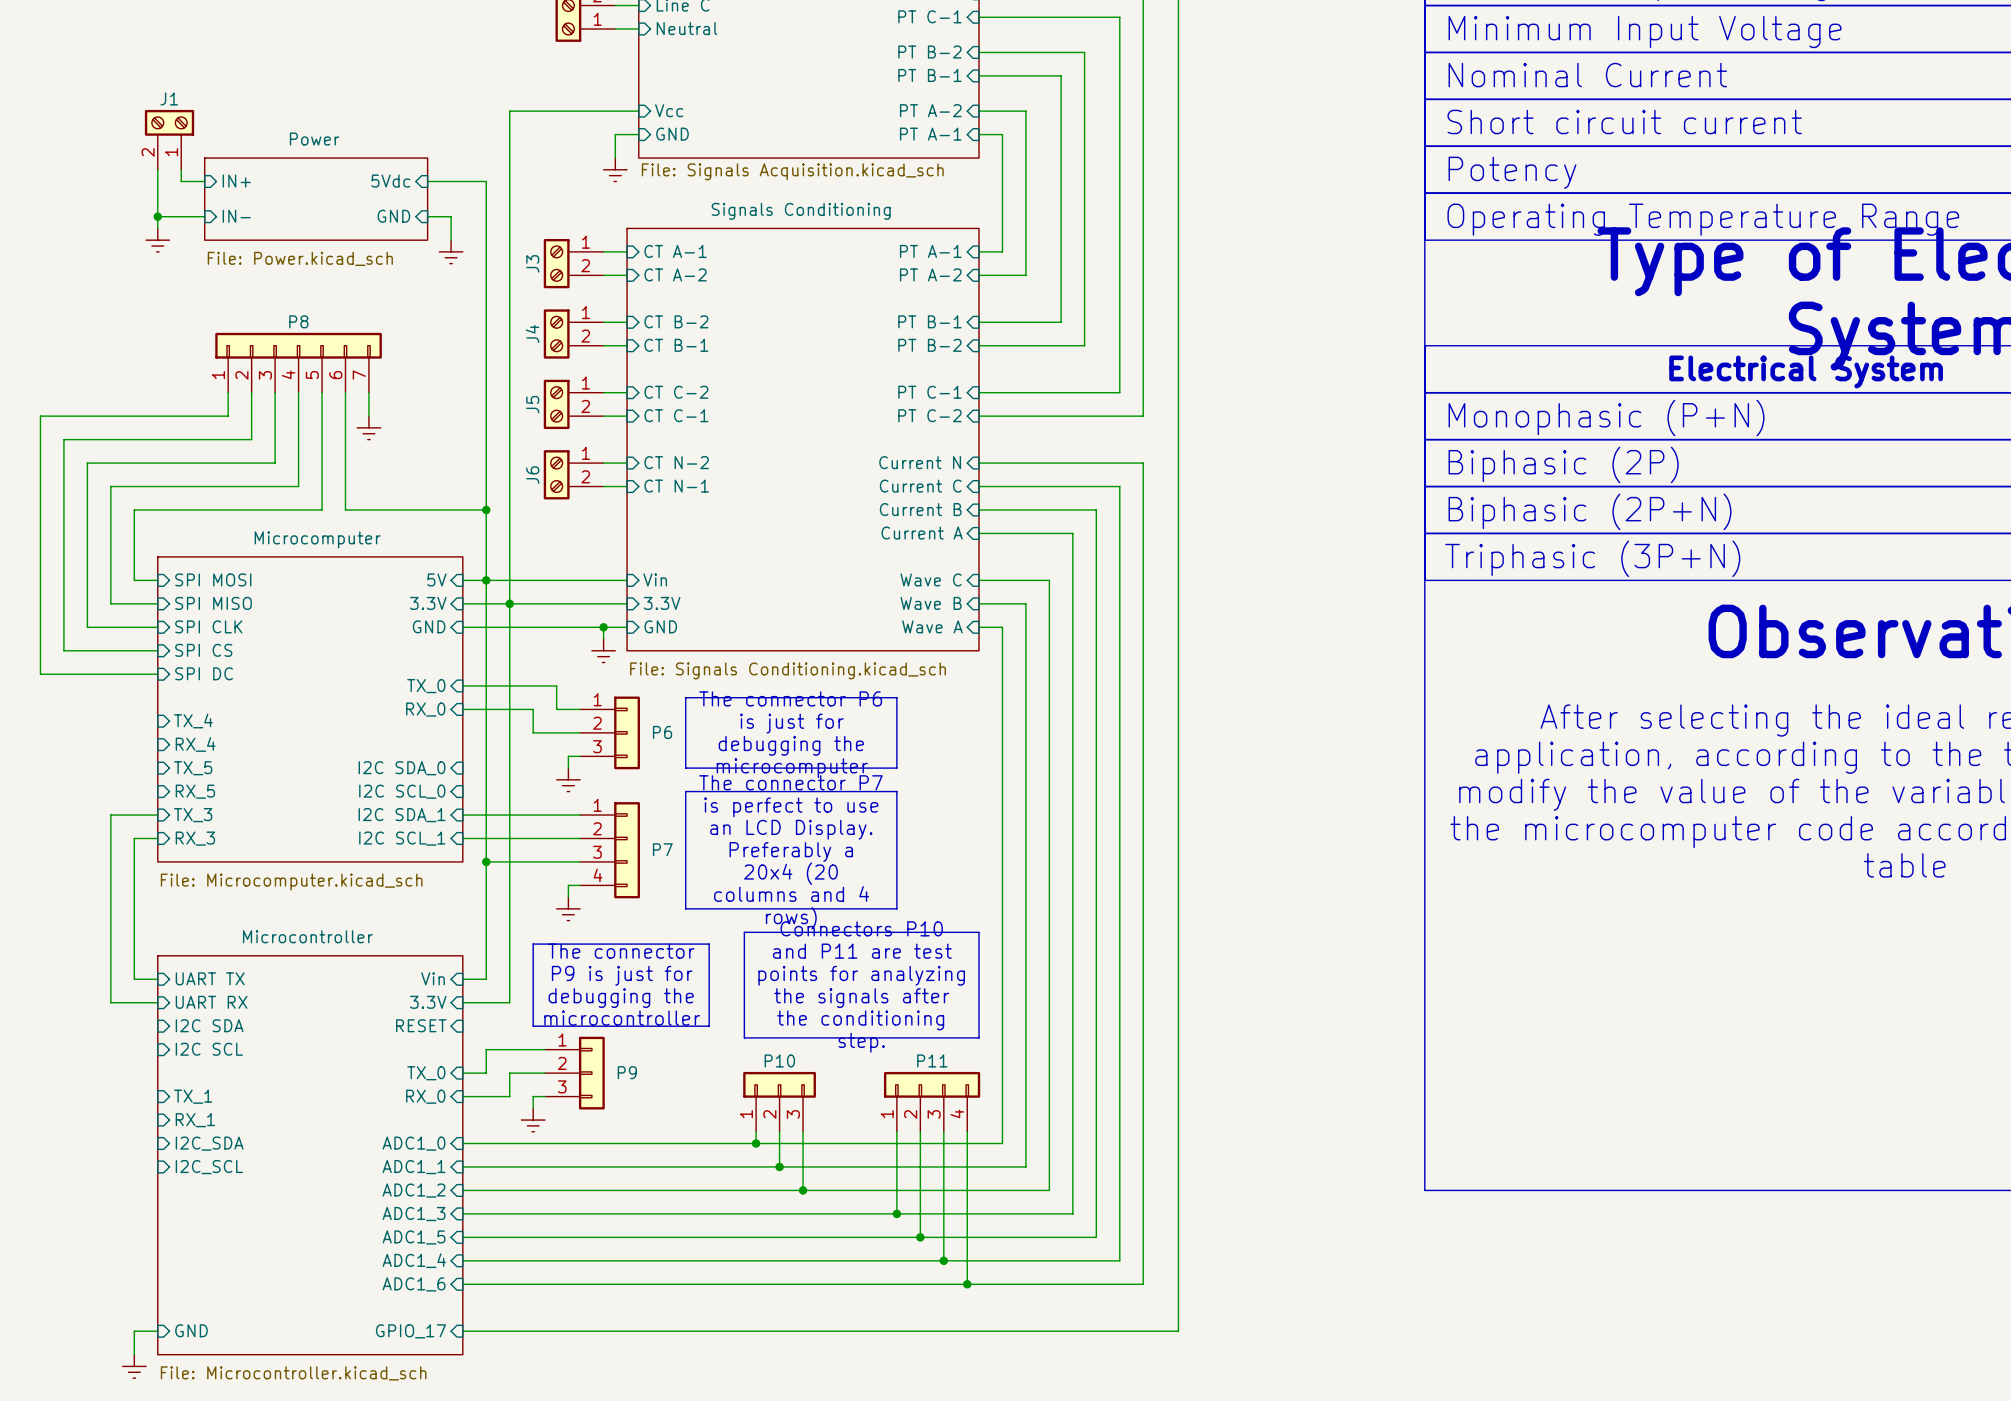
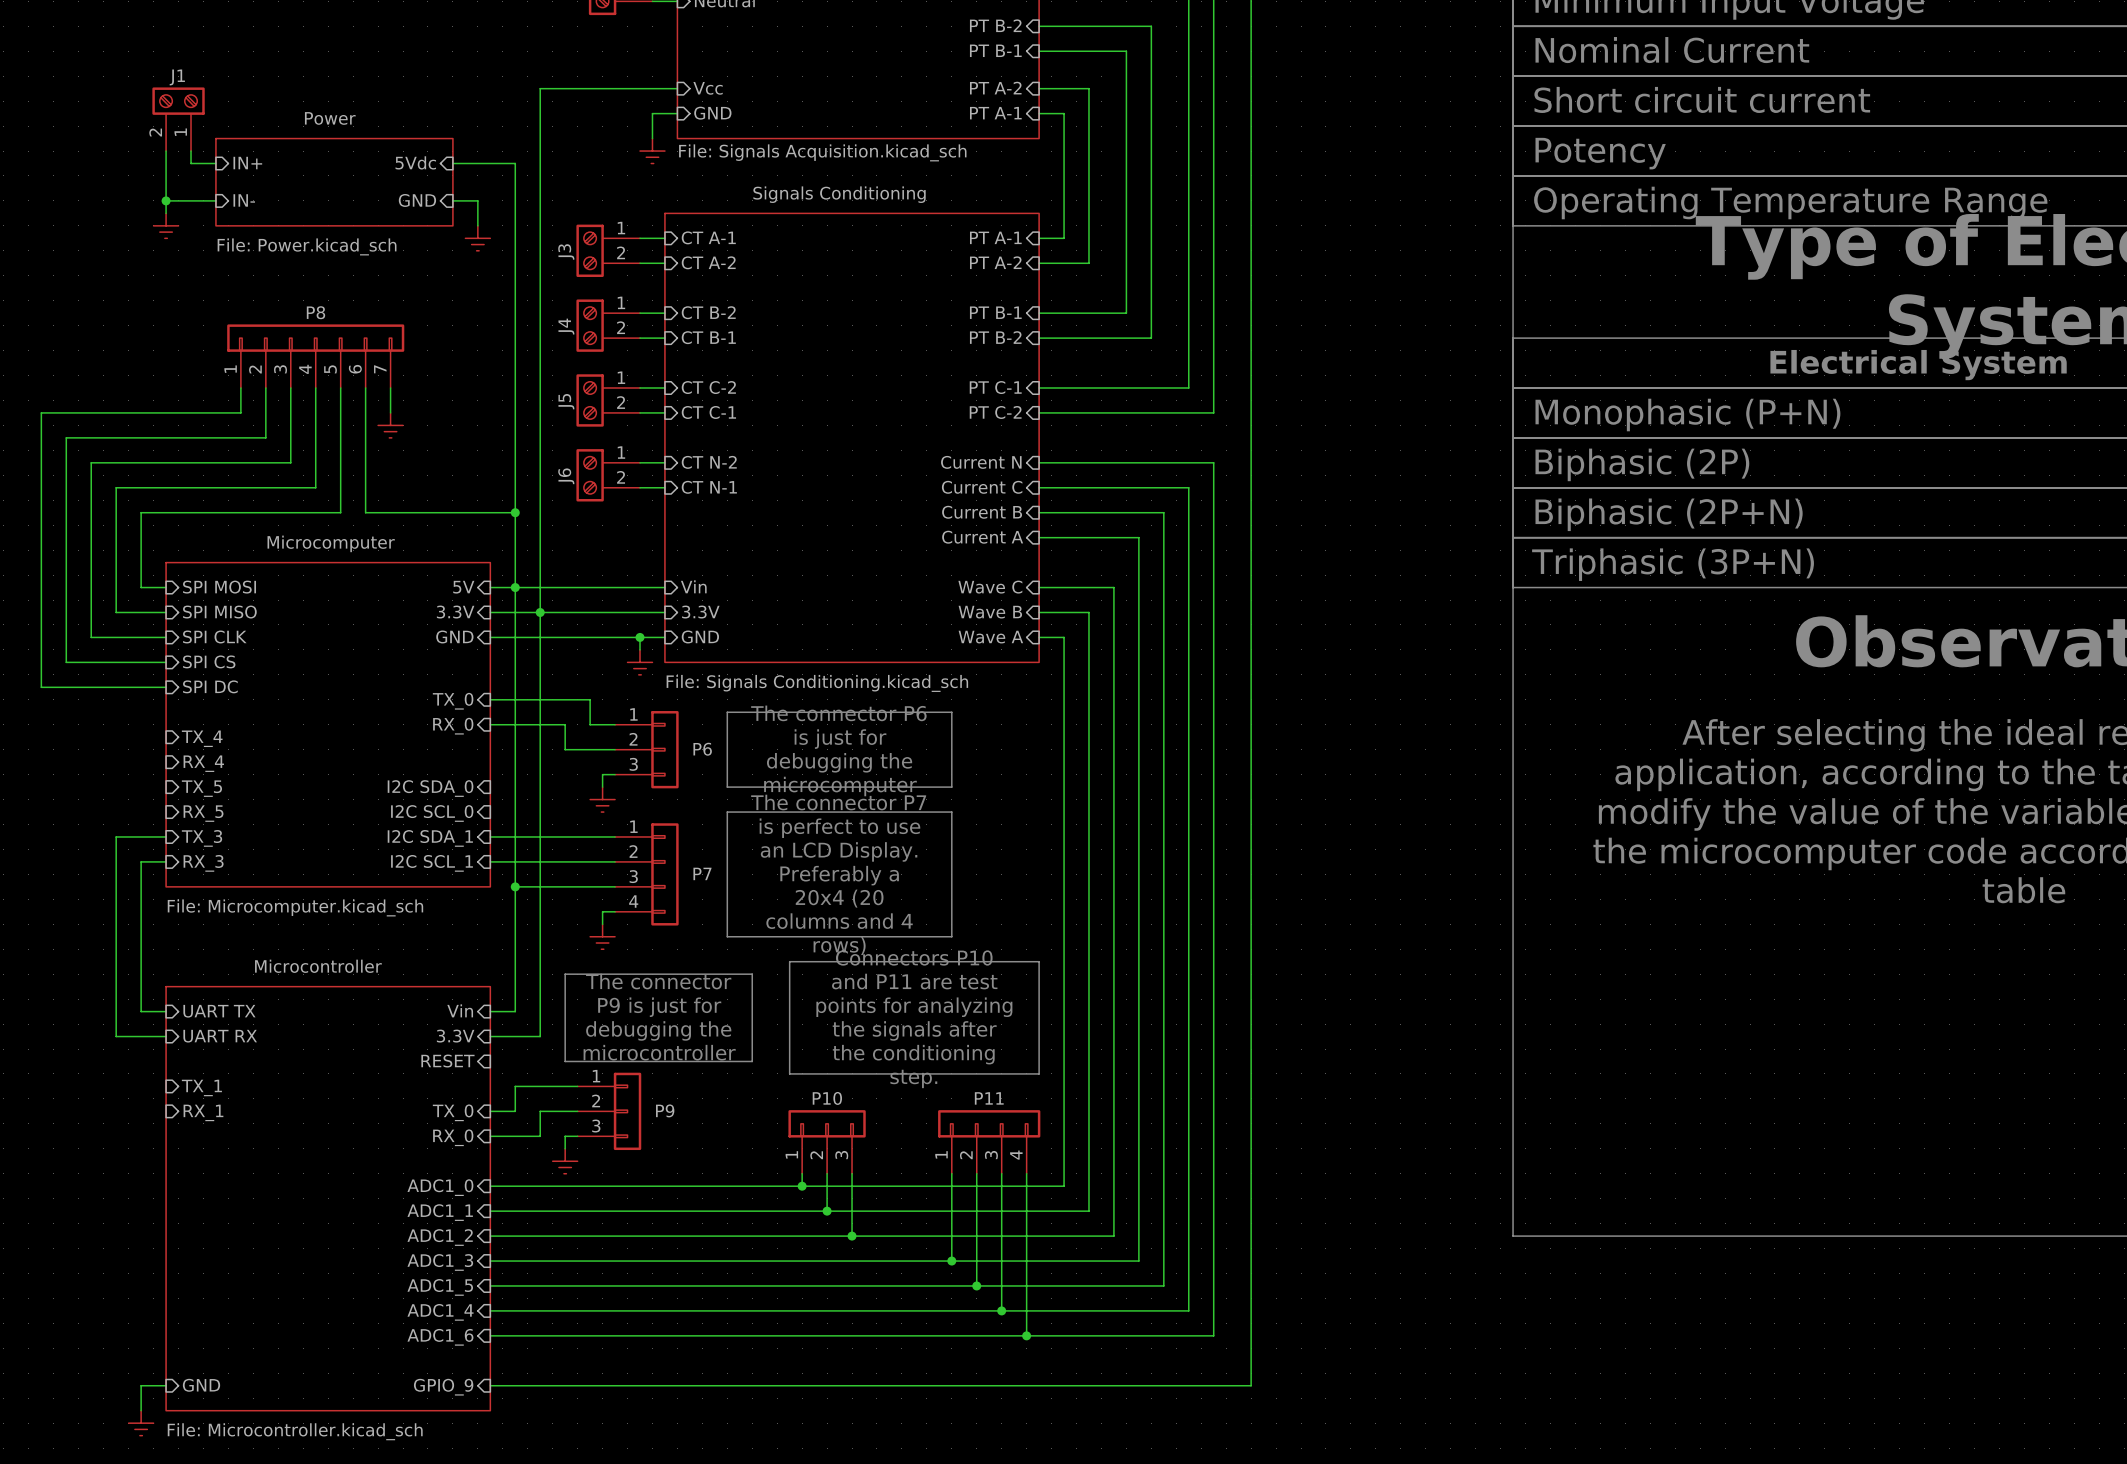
sheet pin: I2C SDA (209, 1025) -> none
sheet pin: I2C SCL (209, 1049) -> TX_1 (201, 1087)
sheet pin: TX_1 (193, 1096) -> none
sheet pin position: RX_1 (195, 1120) -> RX_1 (203, 1112)
sheet pin: I2C_SDA (209, 1143) -> none
sheet pin: I2C_SCL (209, 1167) -> none
sheet pin: GPIO_17 (410, 1331) -> GPIO_9 (443, 1387)

